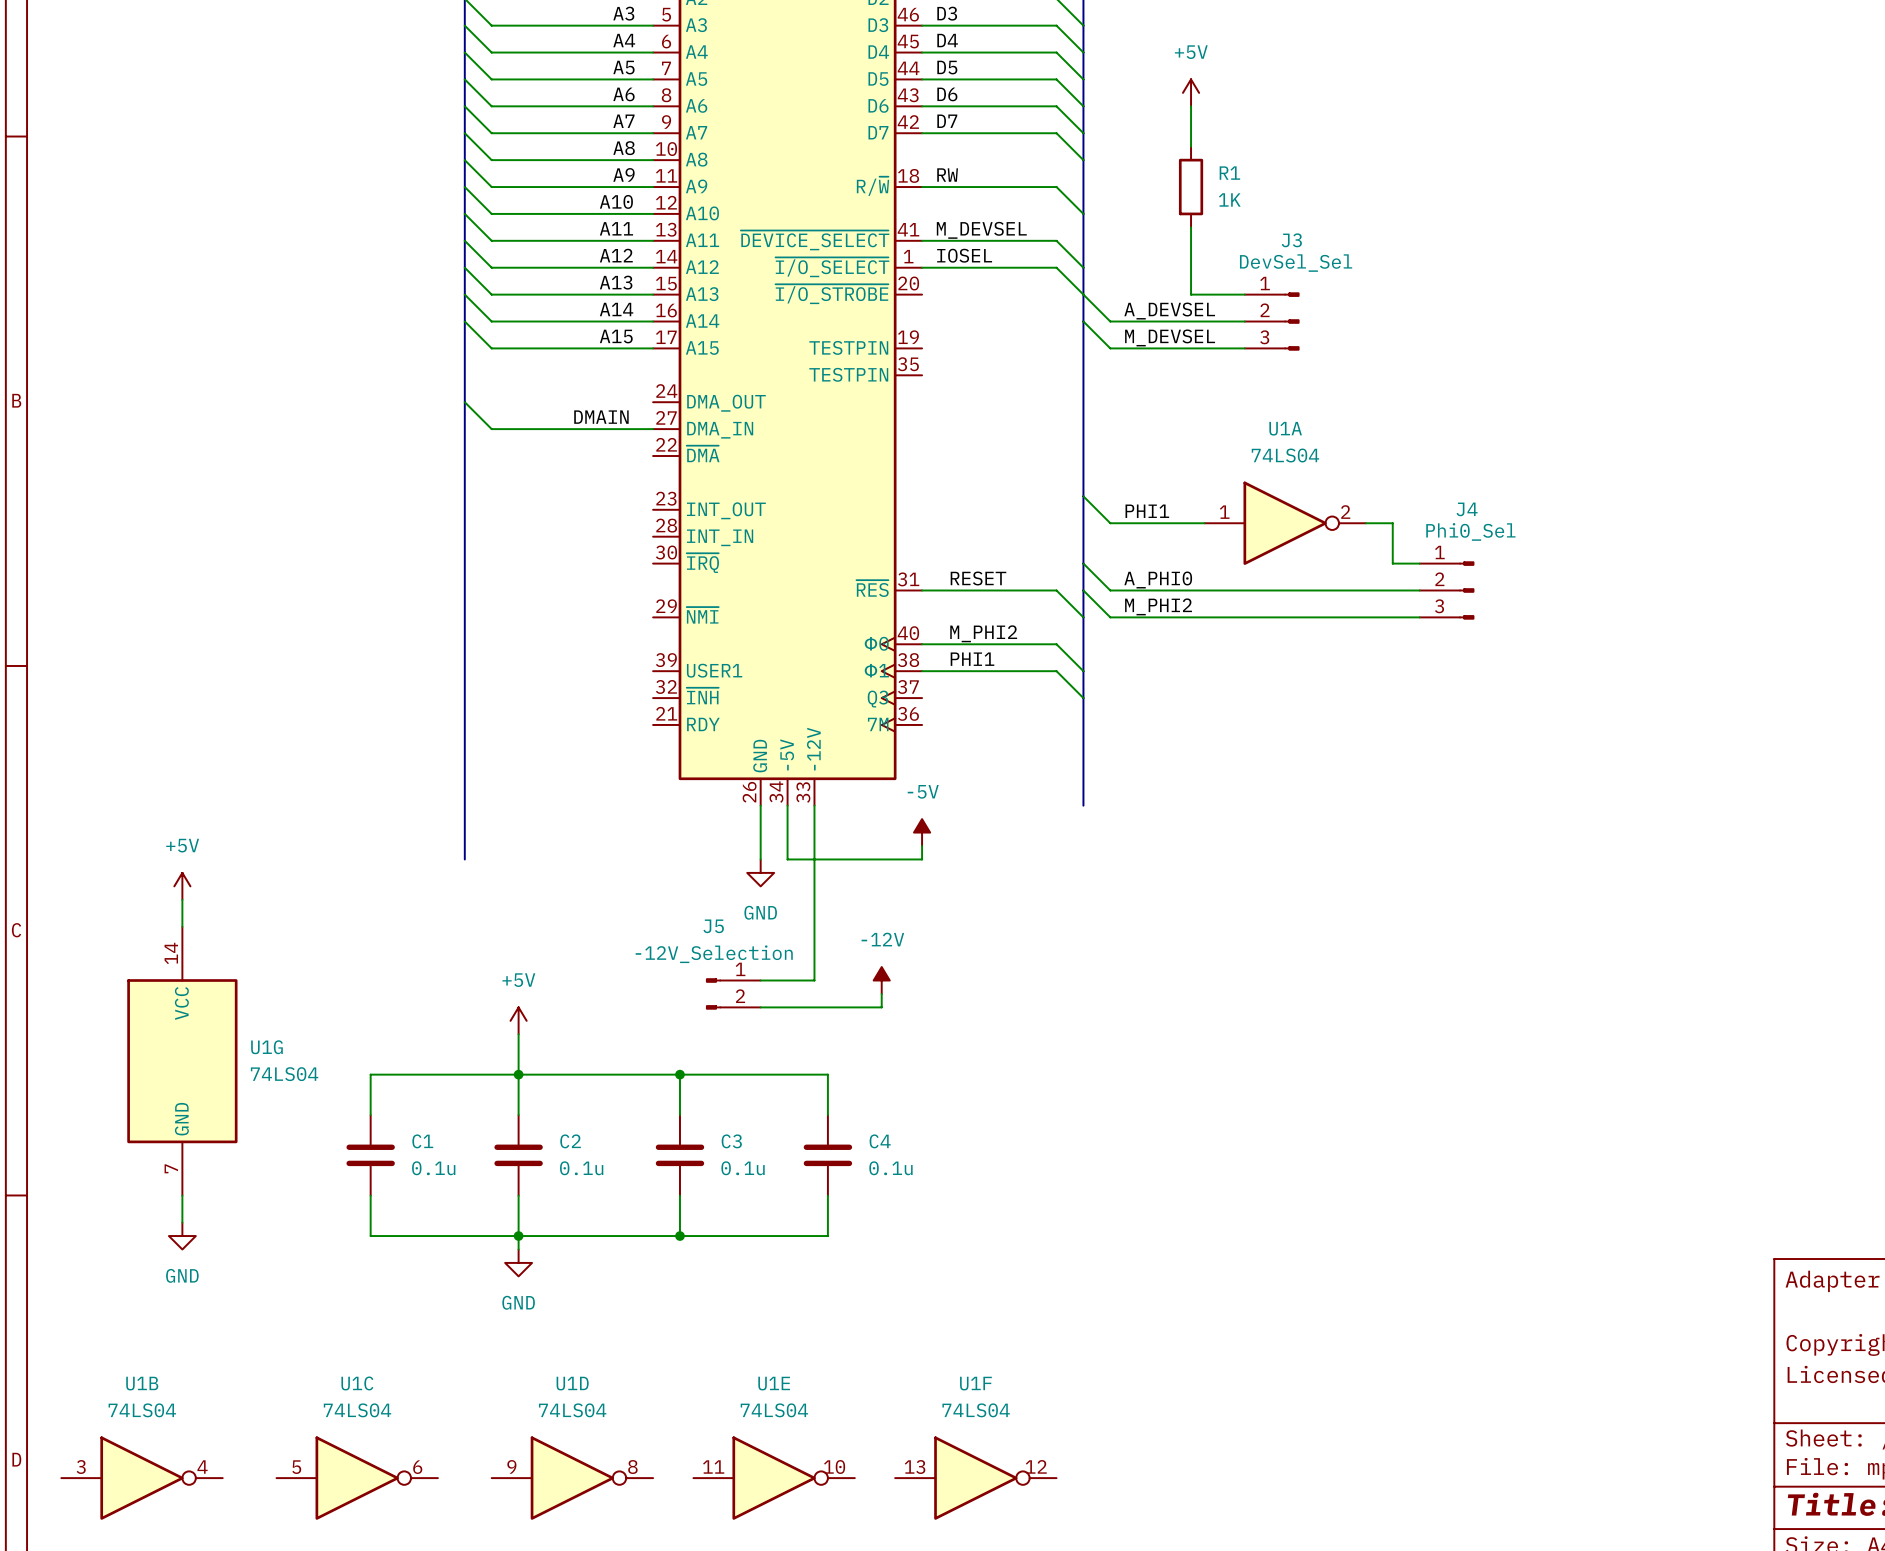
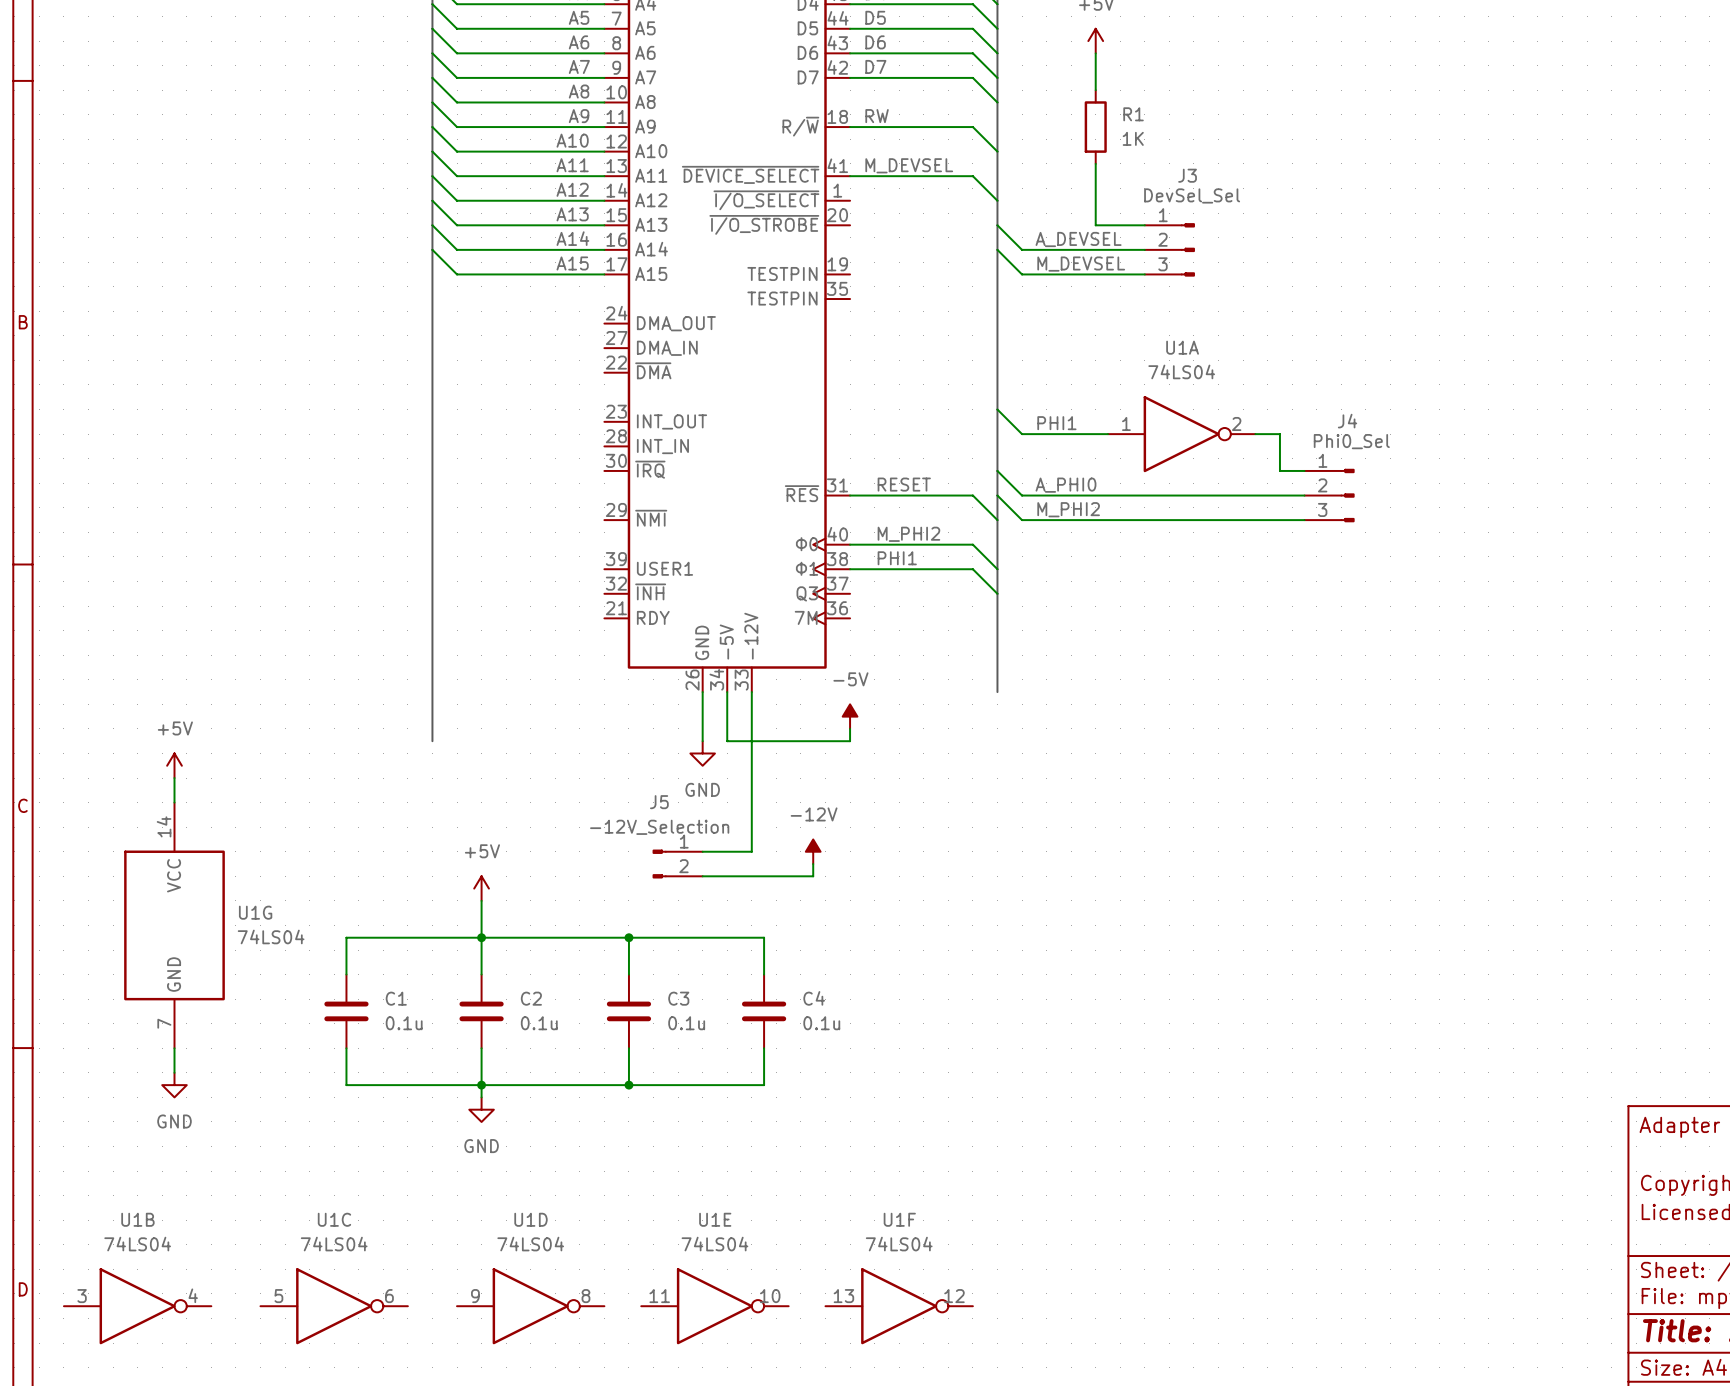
label: IOSEL (964, 255) -> none
wire: (922, 267) (1056, 267) (1083, 294) -> none
wire: (464, 402) (491, 429) (653, 429) -> none
label: DMAIN (601, 417) -> none

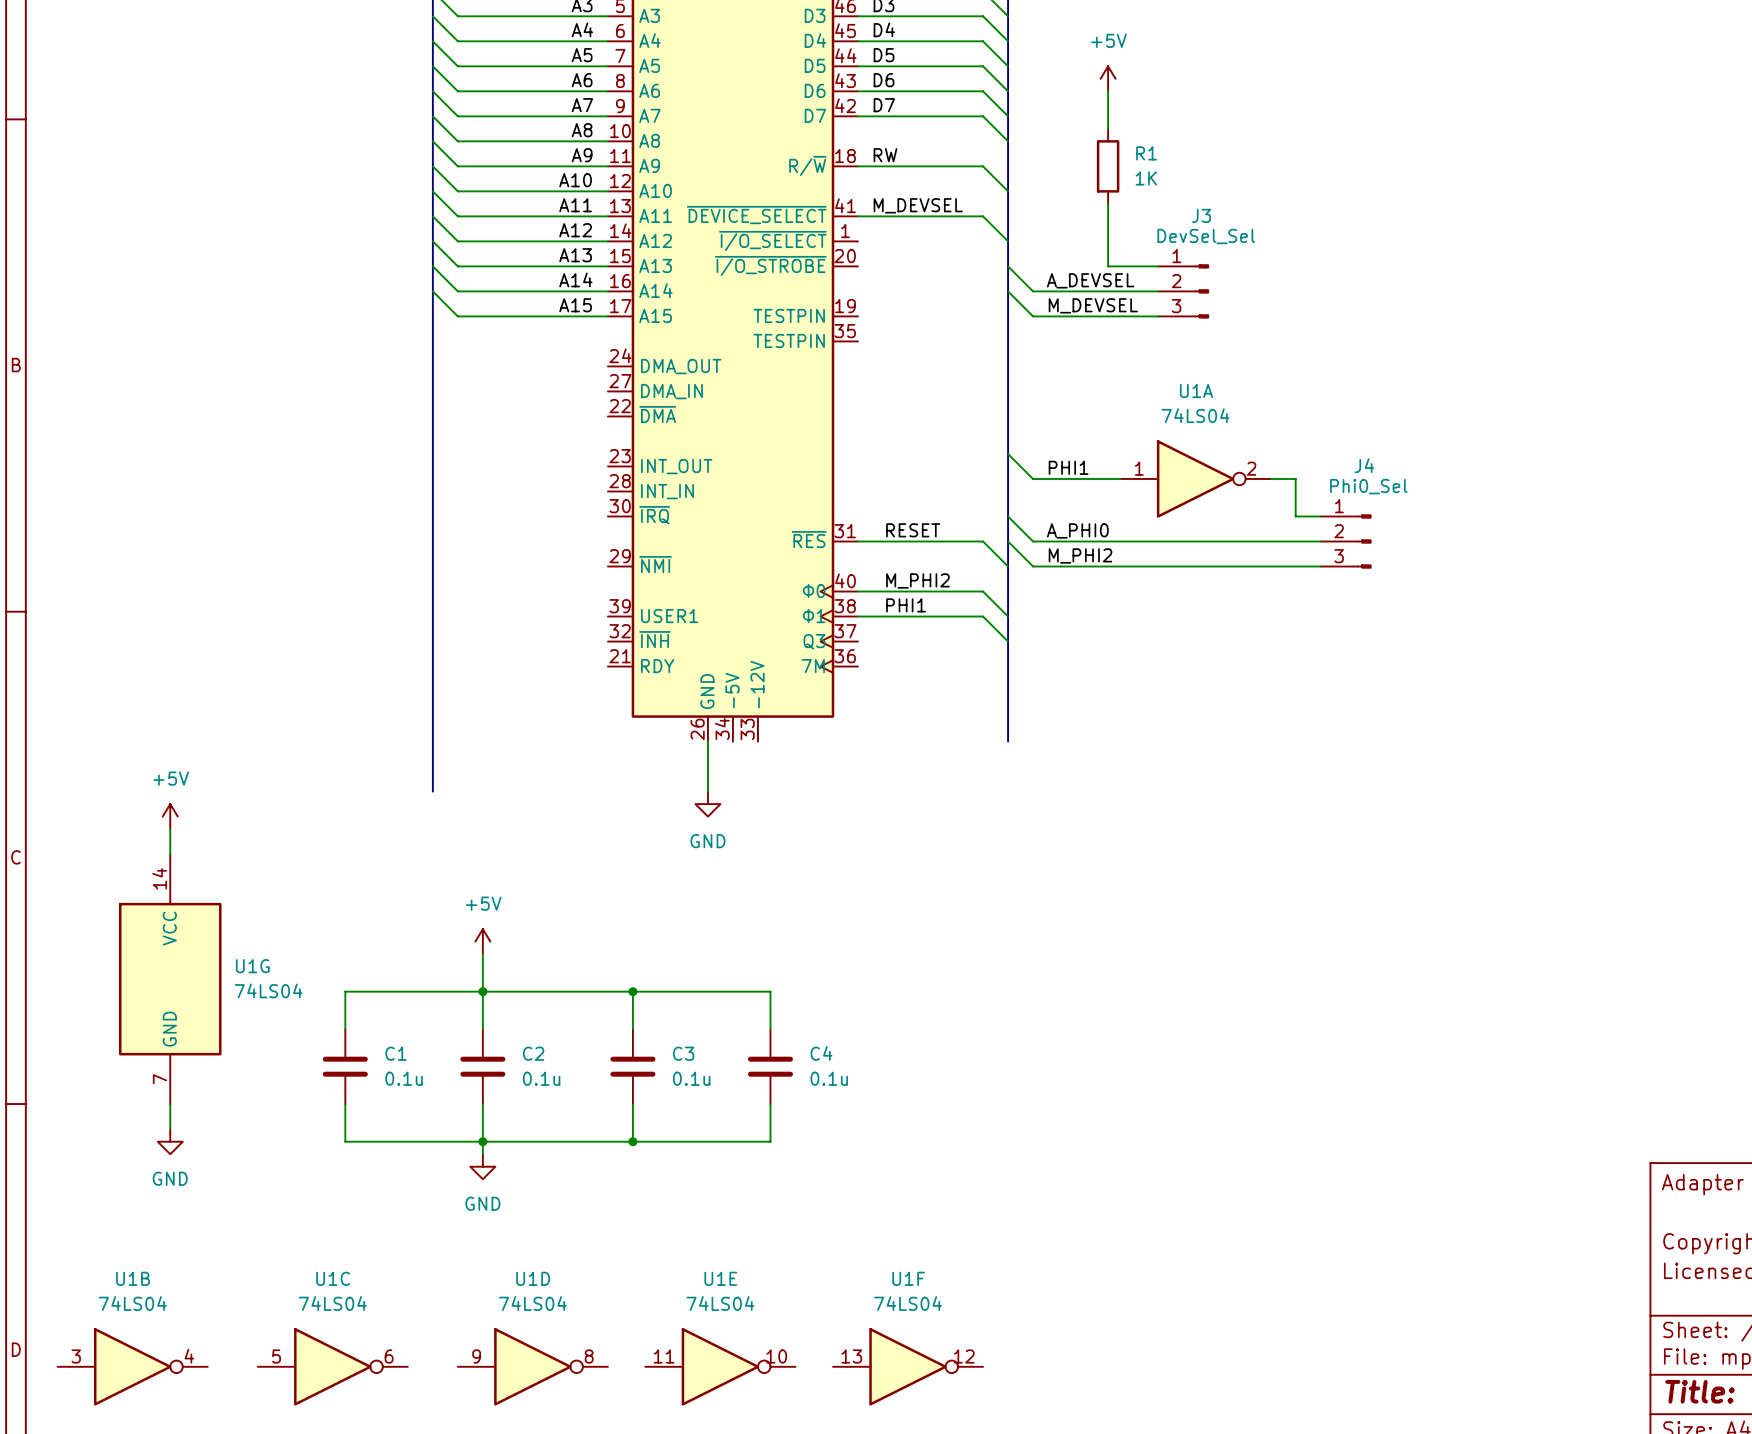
wire: (727, 692) (727, 741) (850, 741) (850, 728) -> none
wire: (751, 692) (751, 851) (702, 851) -> none
power symbol: -5V (850, 716) -> none
power symbol: -12V (813, 851) -> none
J5: -12V_Selection (677, 864) -> none
wire: (813, 864) (813, 876) (702, 876) -> none

